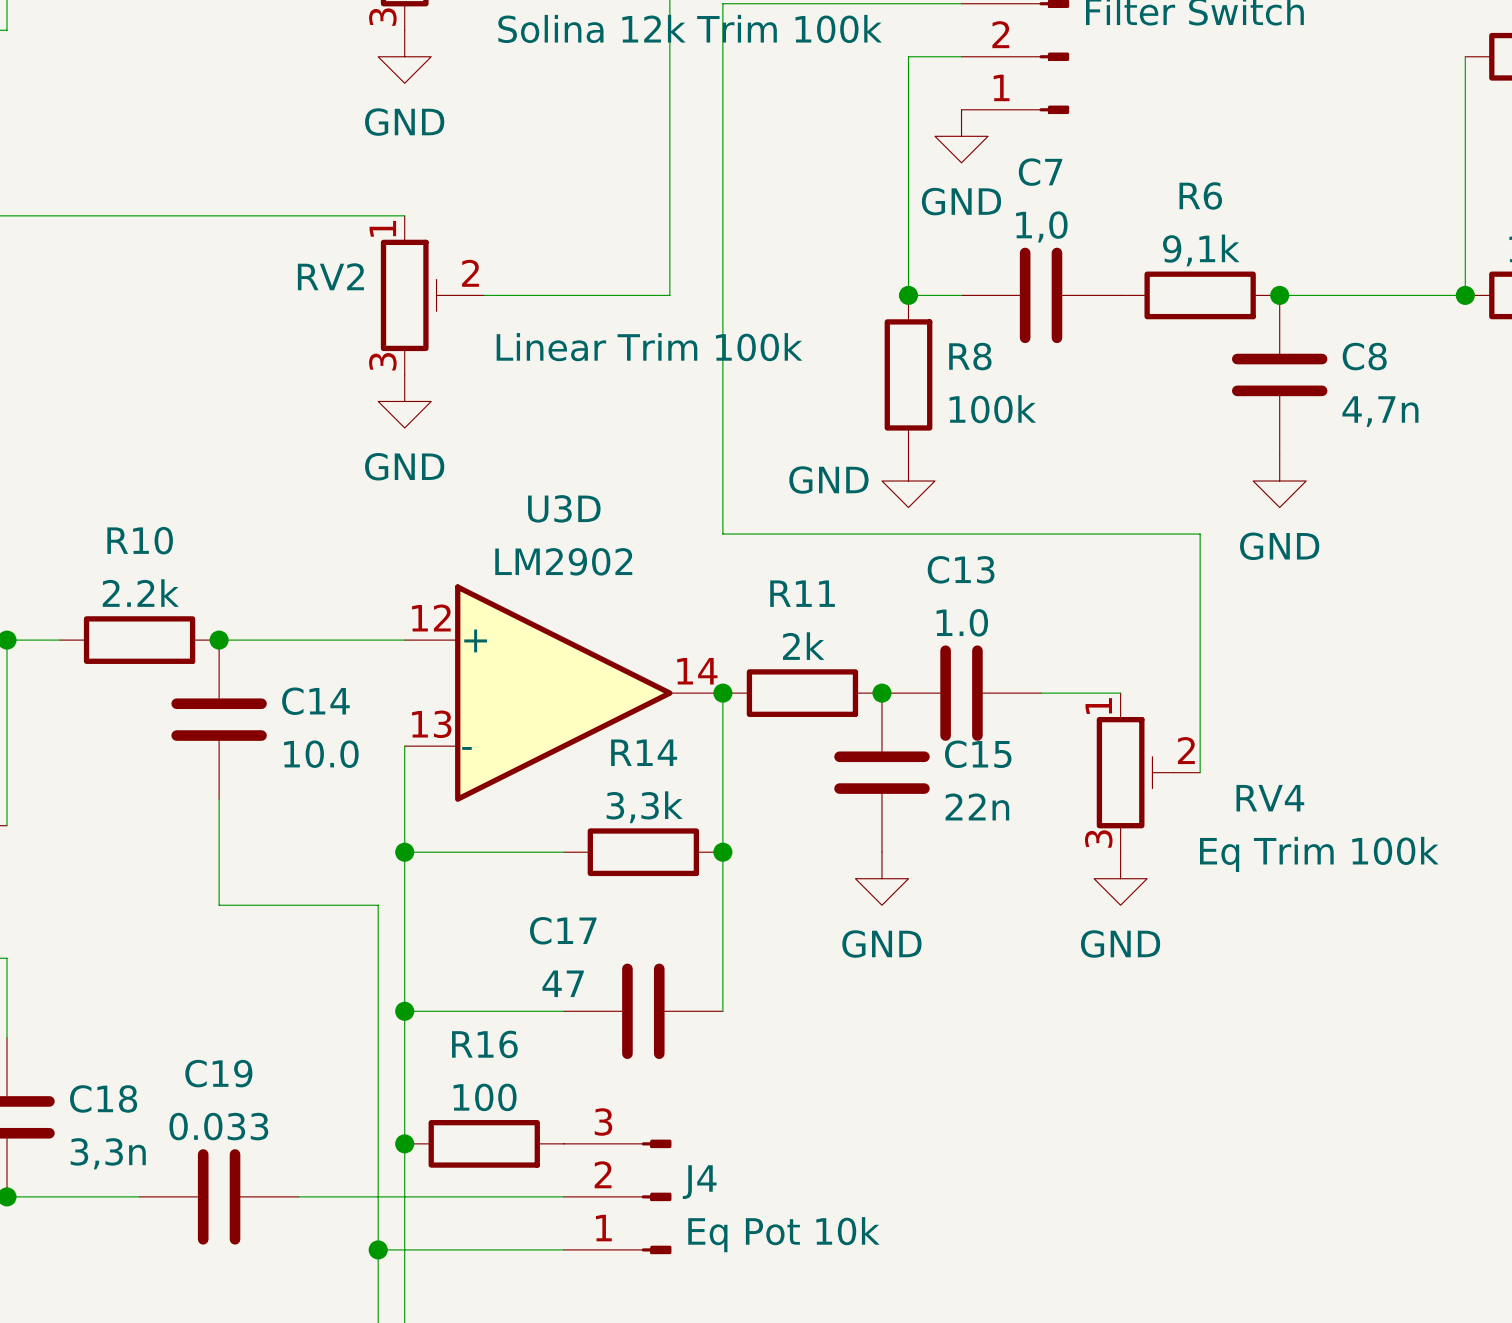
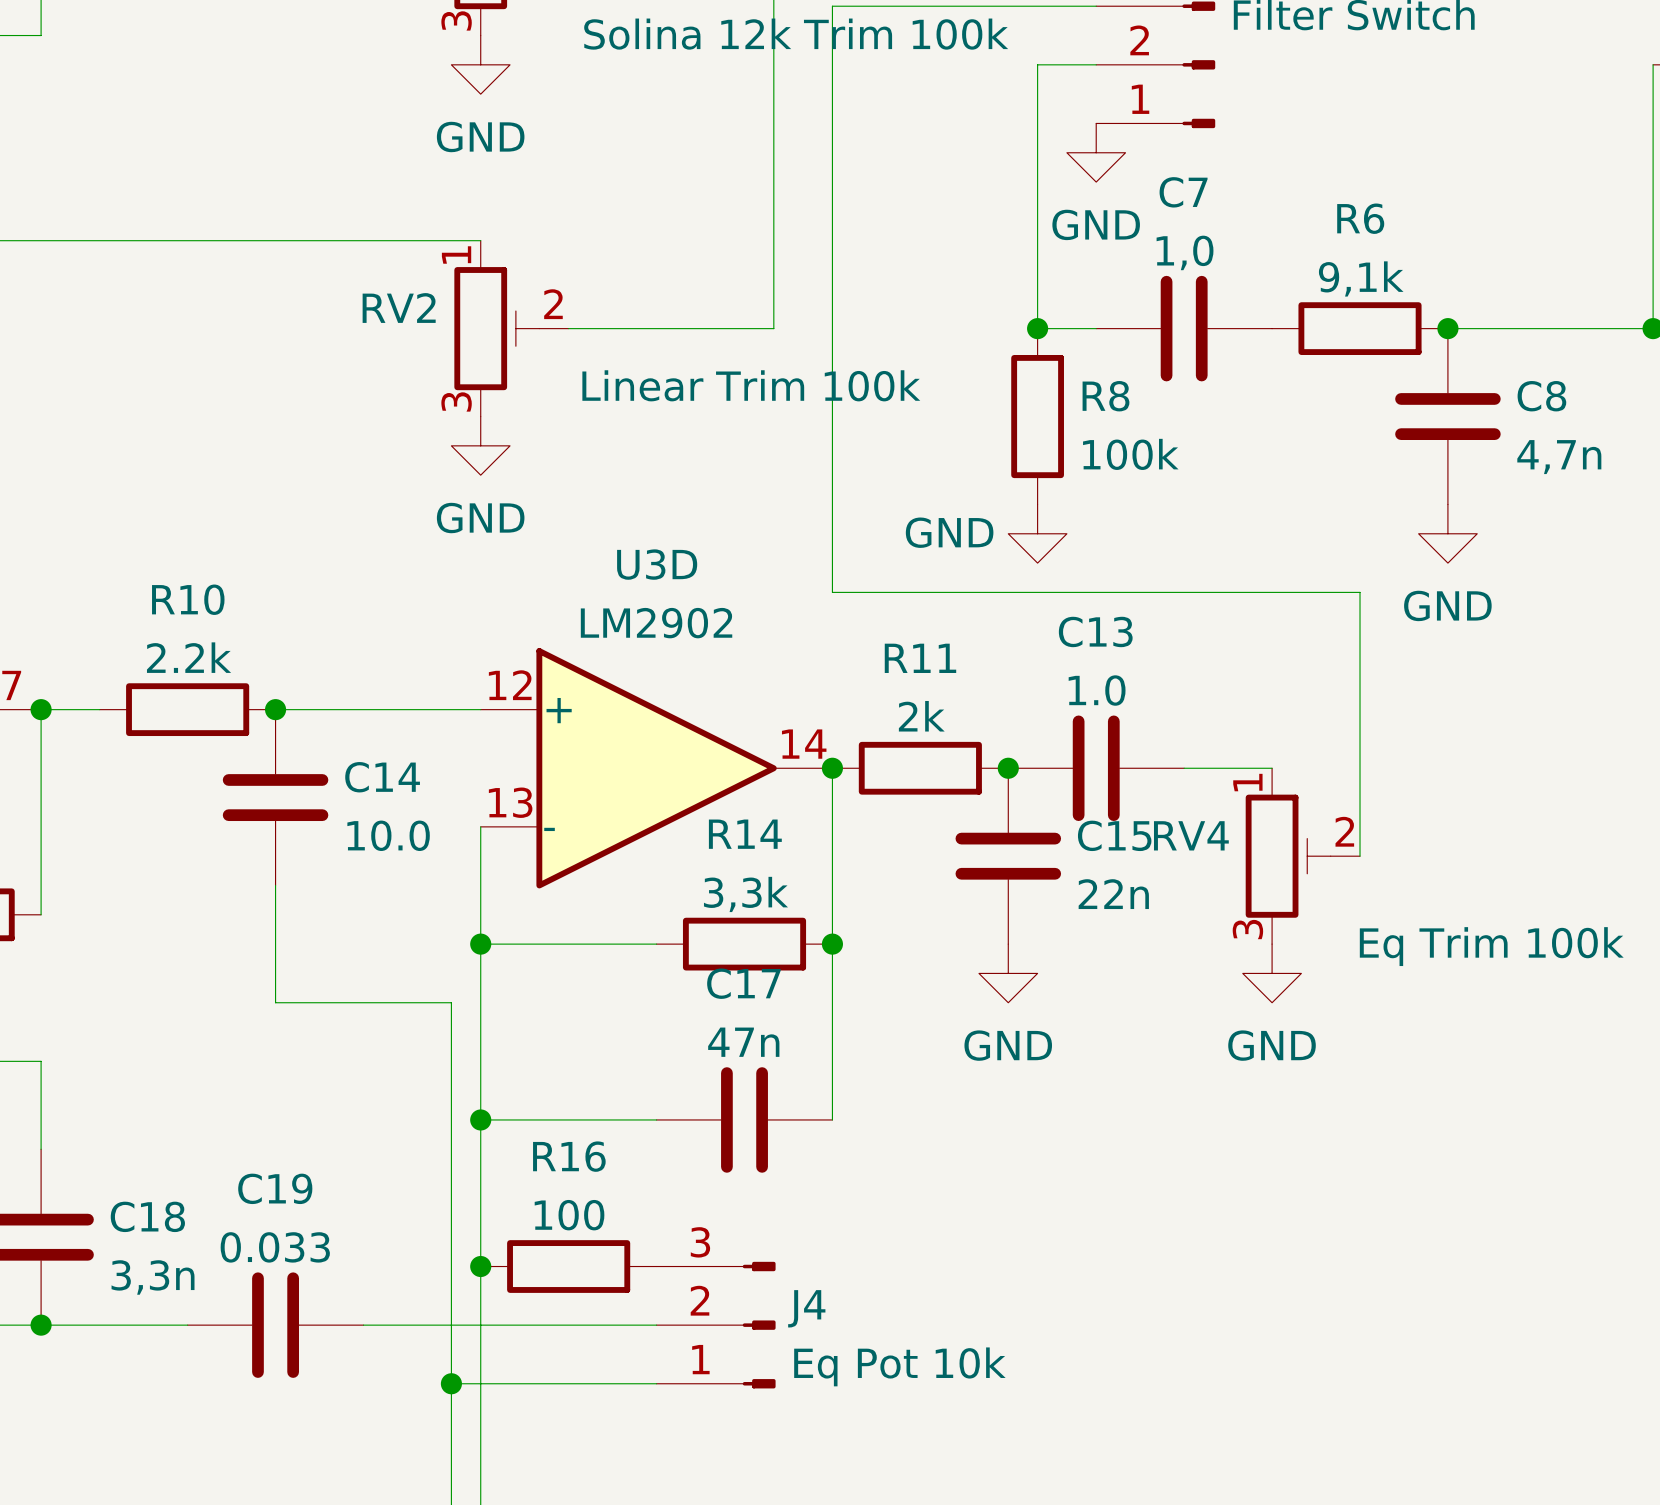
RV4 name position: RV4 (1270, 798) -> RV4 (1191, 835)
C17 name position: C17 (563, 930) -> C17 (743, 983)
C17 value: 47 (563, 983) -> 47n (743, 1042)

